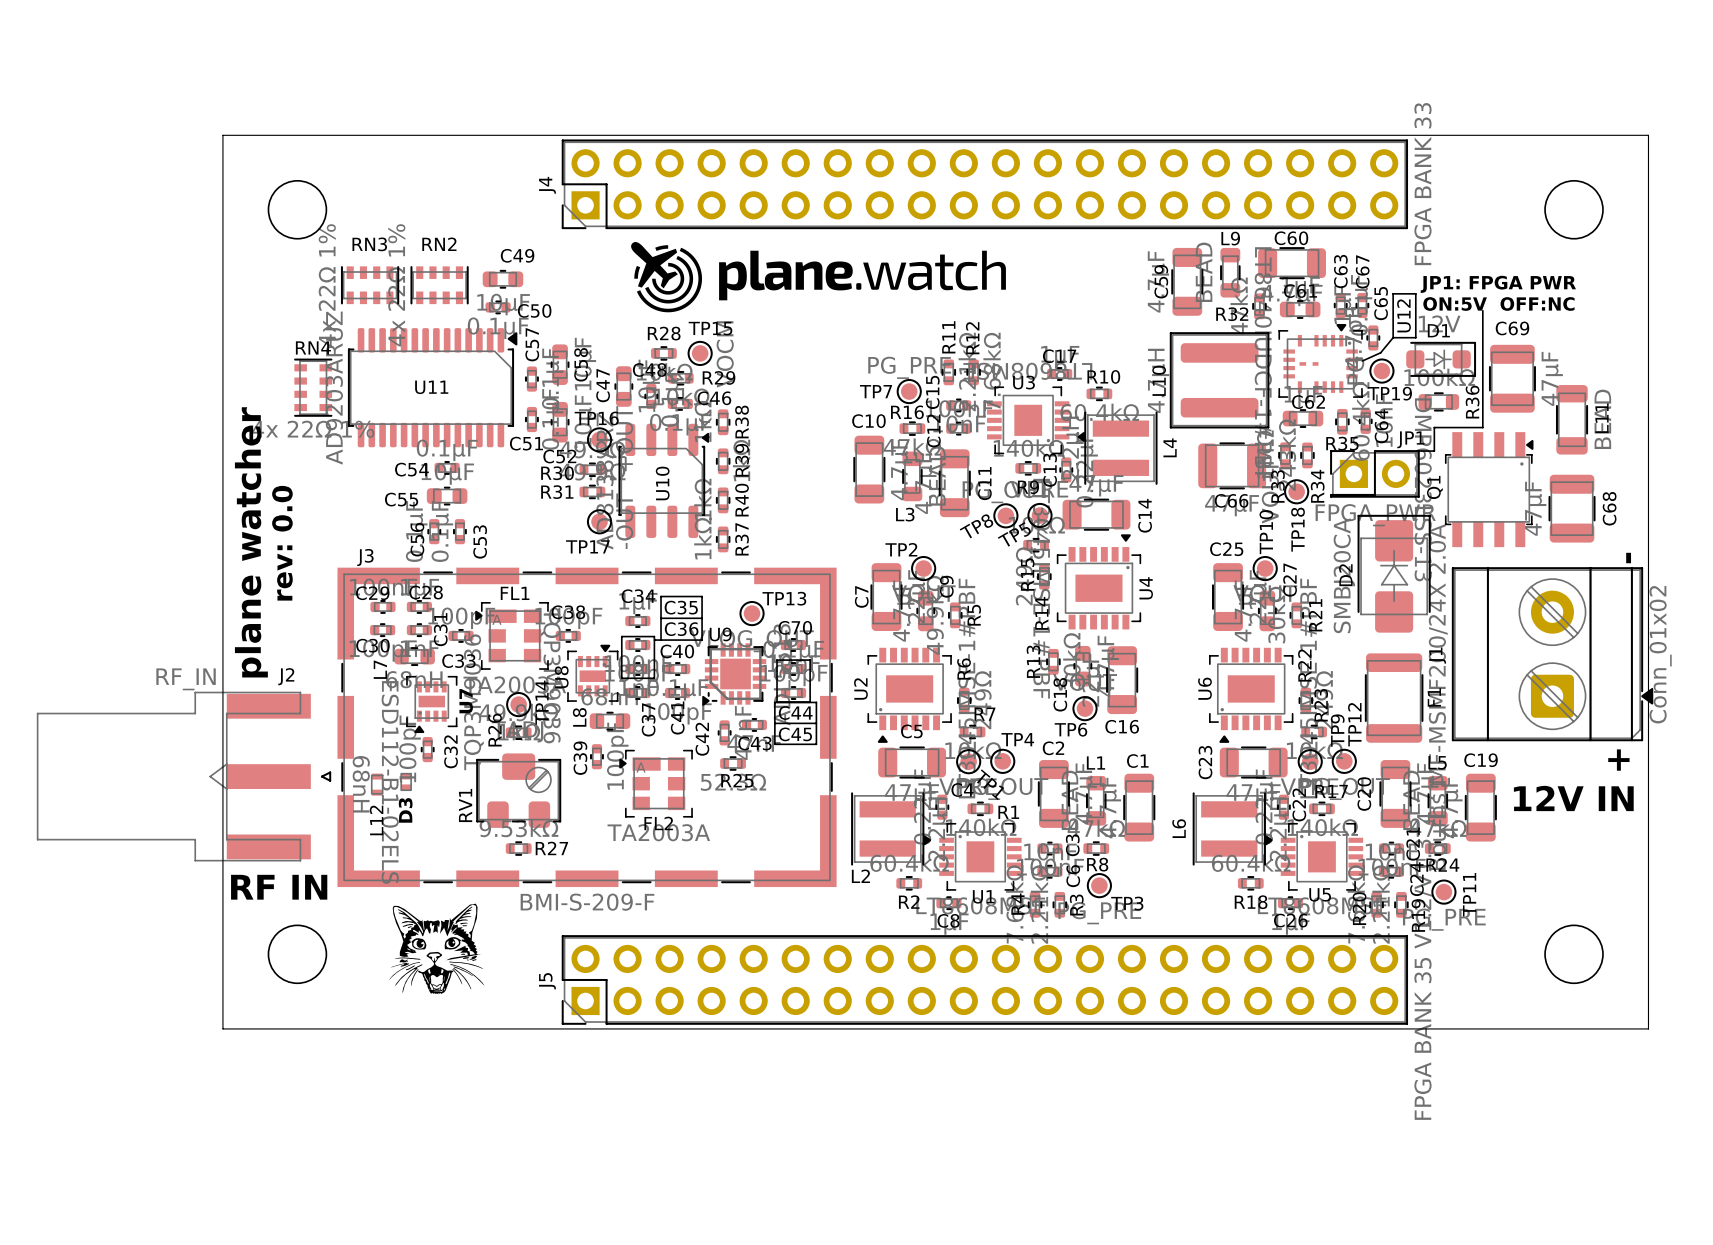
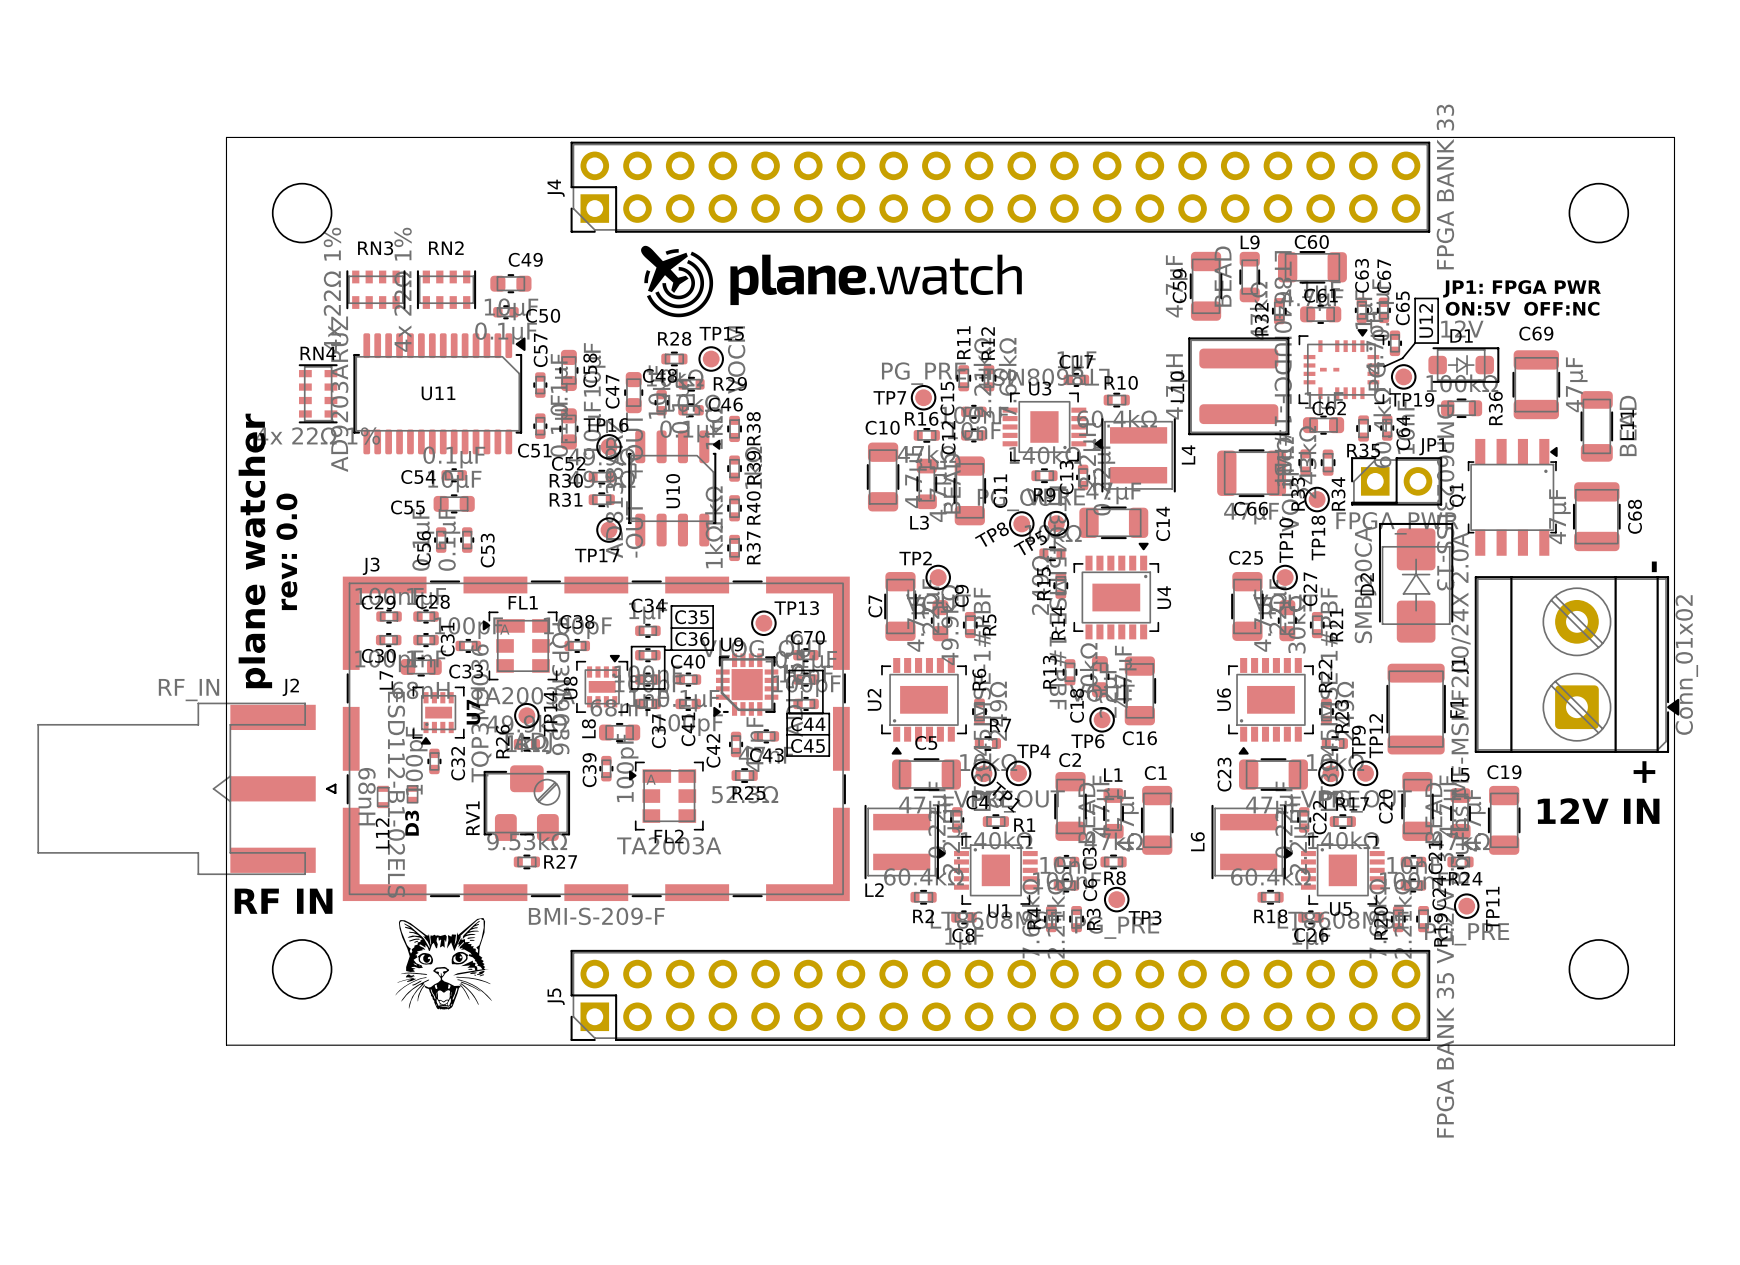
line: (1482, 310) (1482, 427) (1434, 427) (1434, 451) (1418, 451) -> none
R32 name rotation: 0° (1232, 314) -> 90° counterclockwise (1261, 319)

